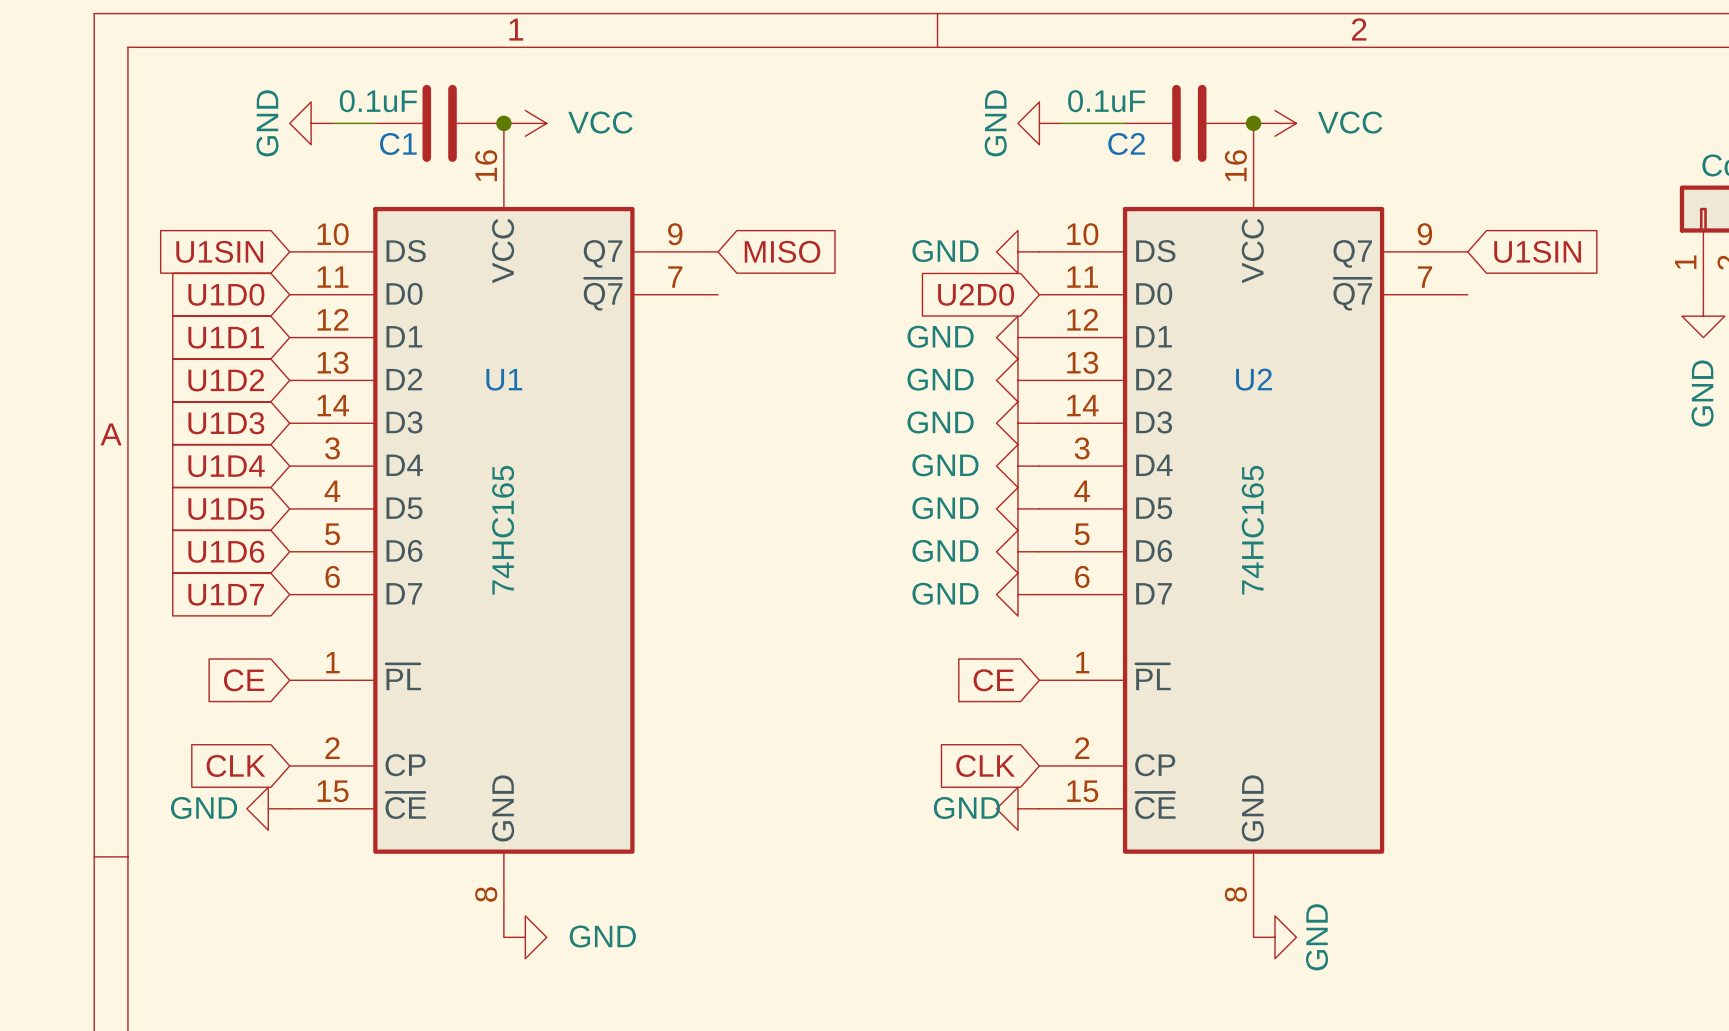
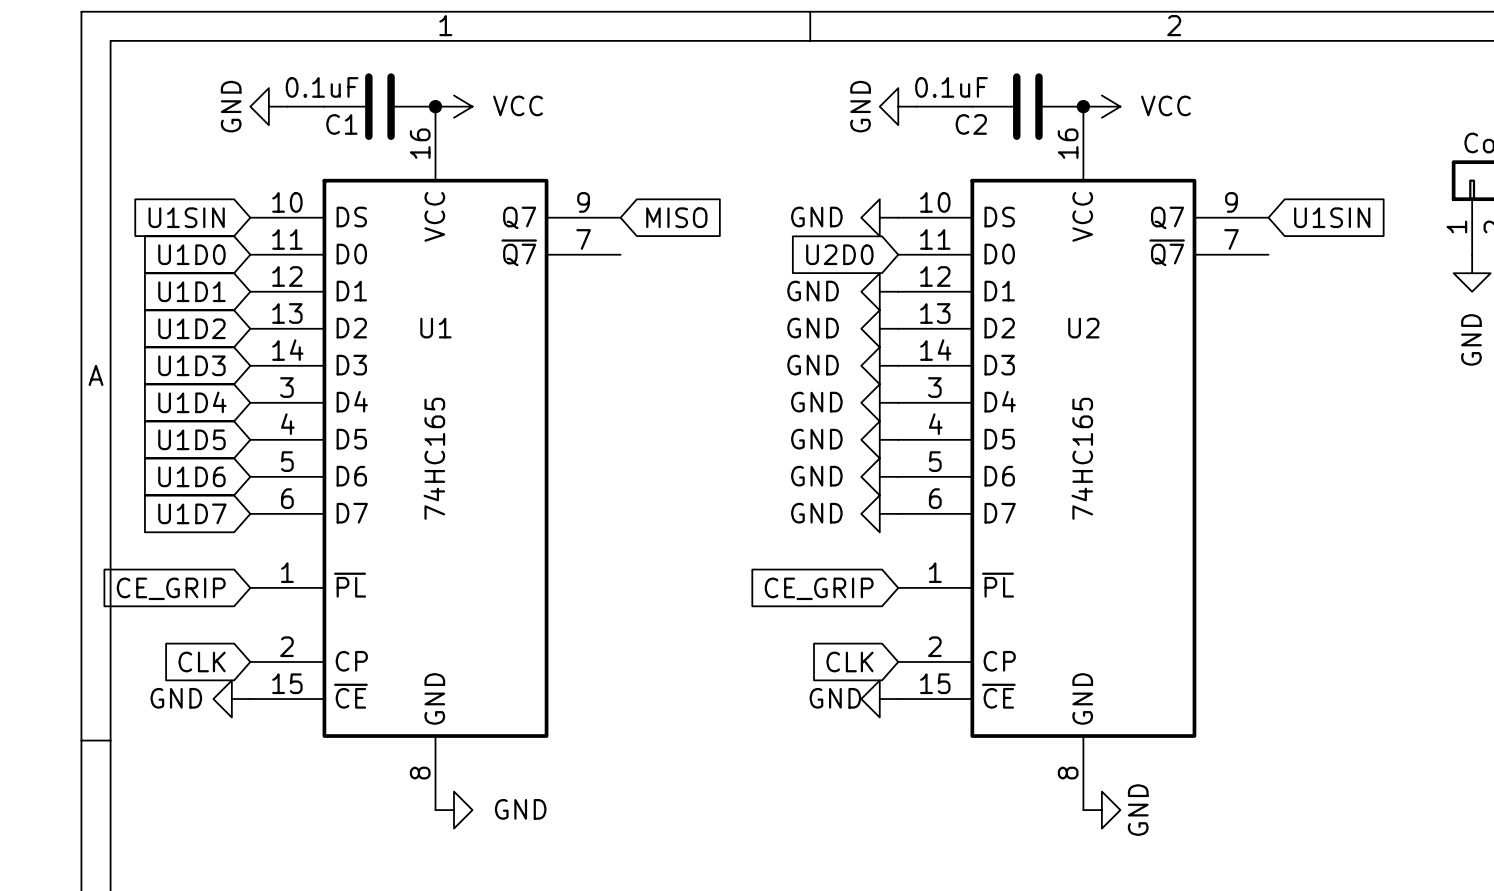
global label: CE (244, 680) -> CE_GRIP (171, 588)
global label: CE (993, 680) -> CE_GRIP (819, 588)

